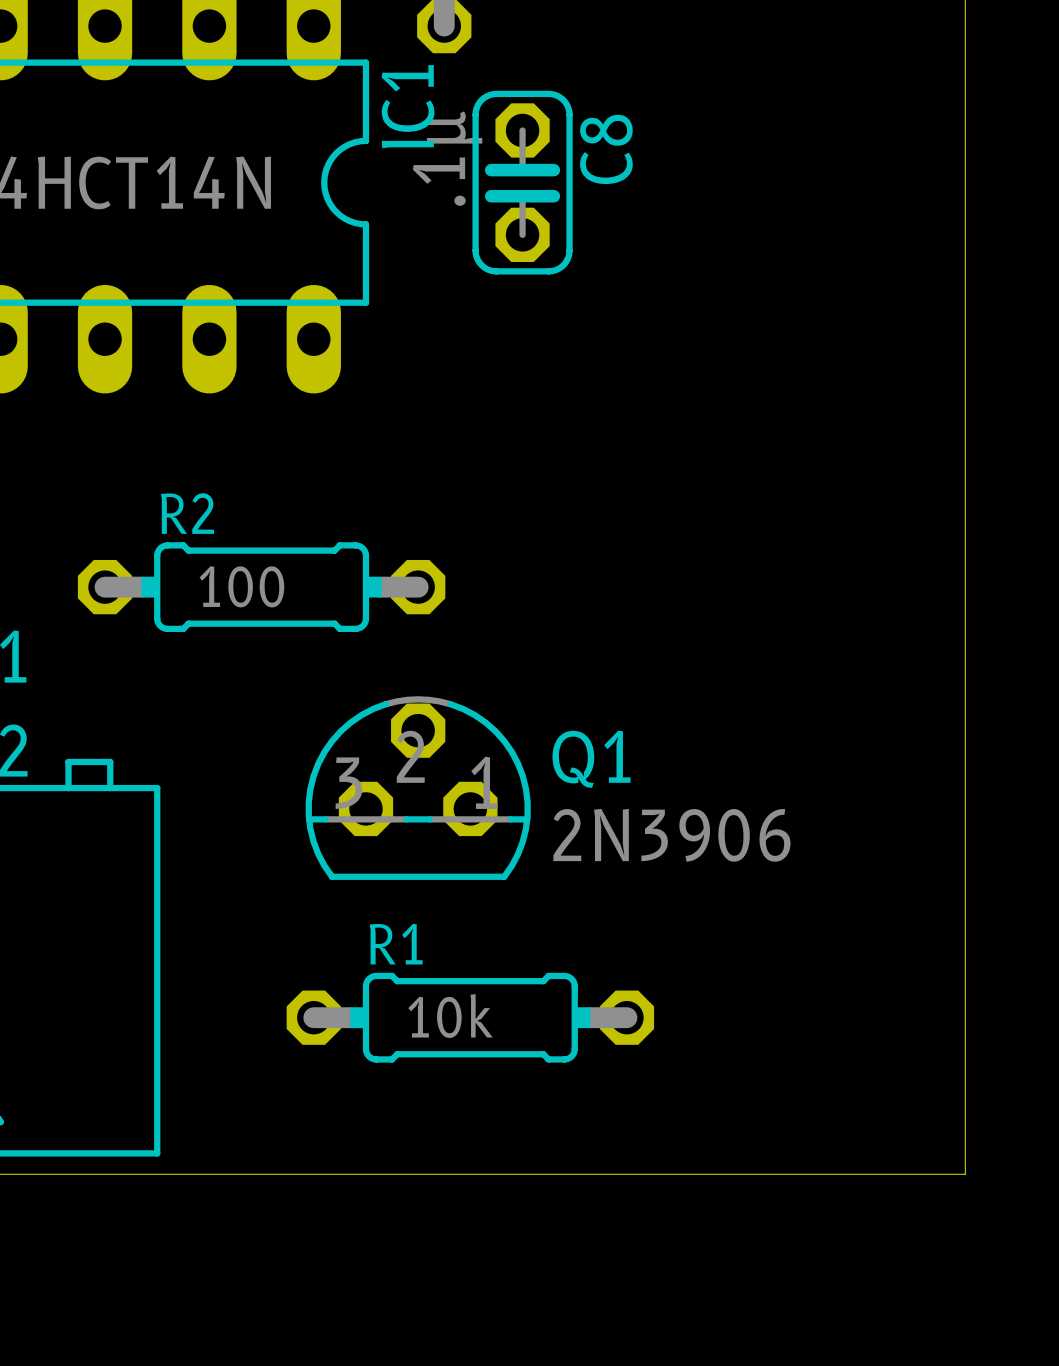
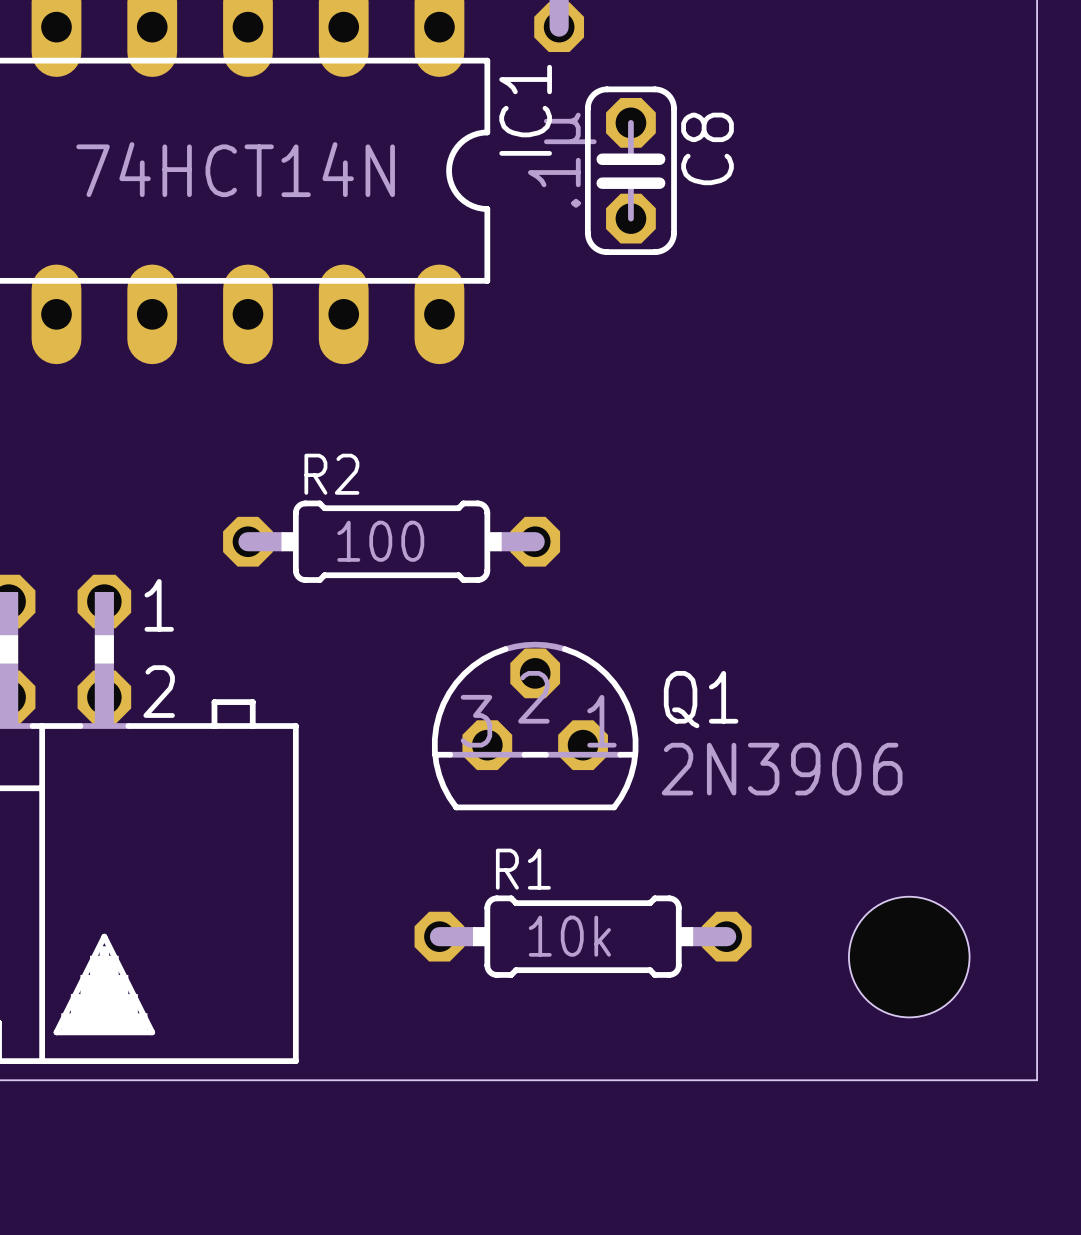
hole: none -> (909, 957)

